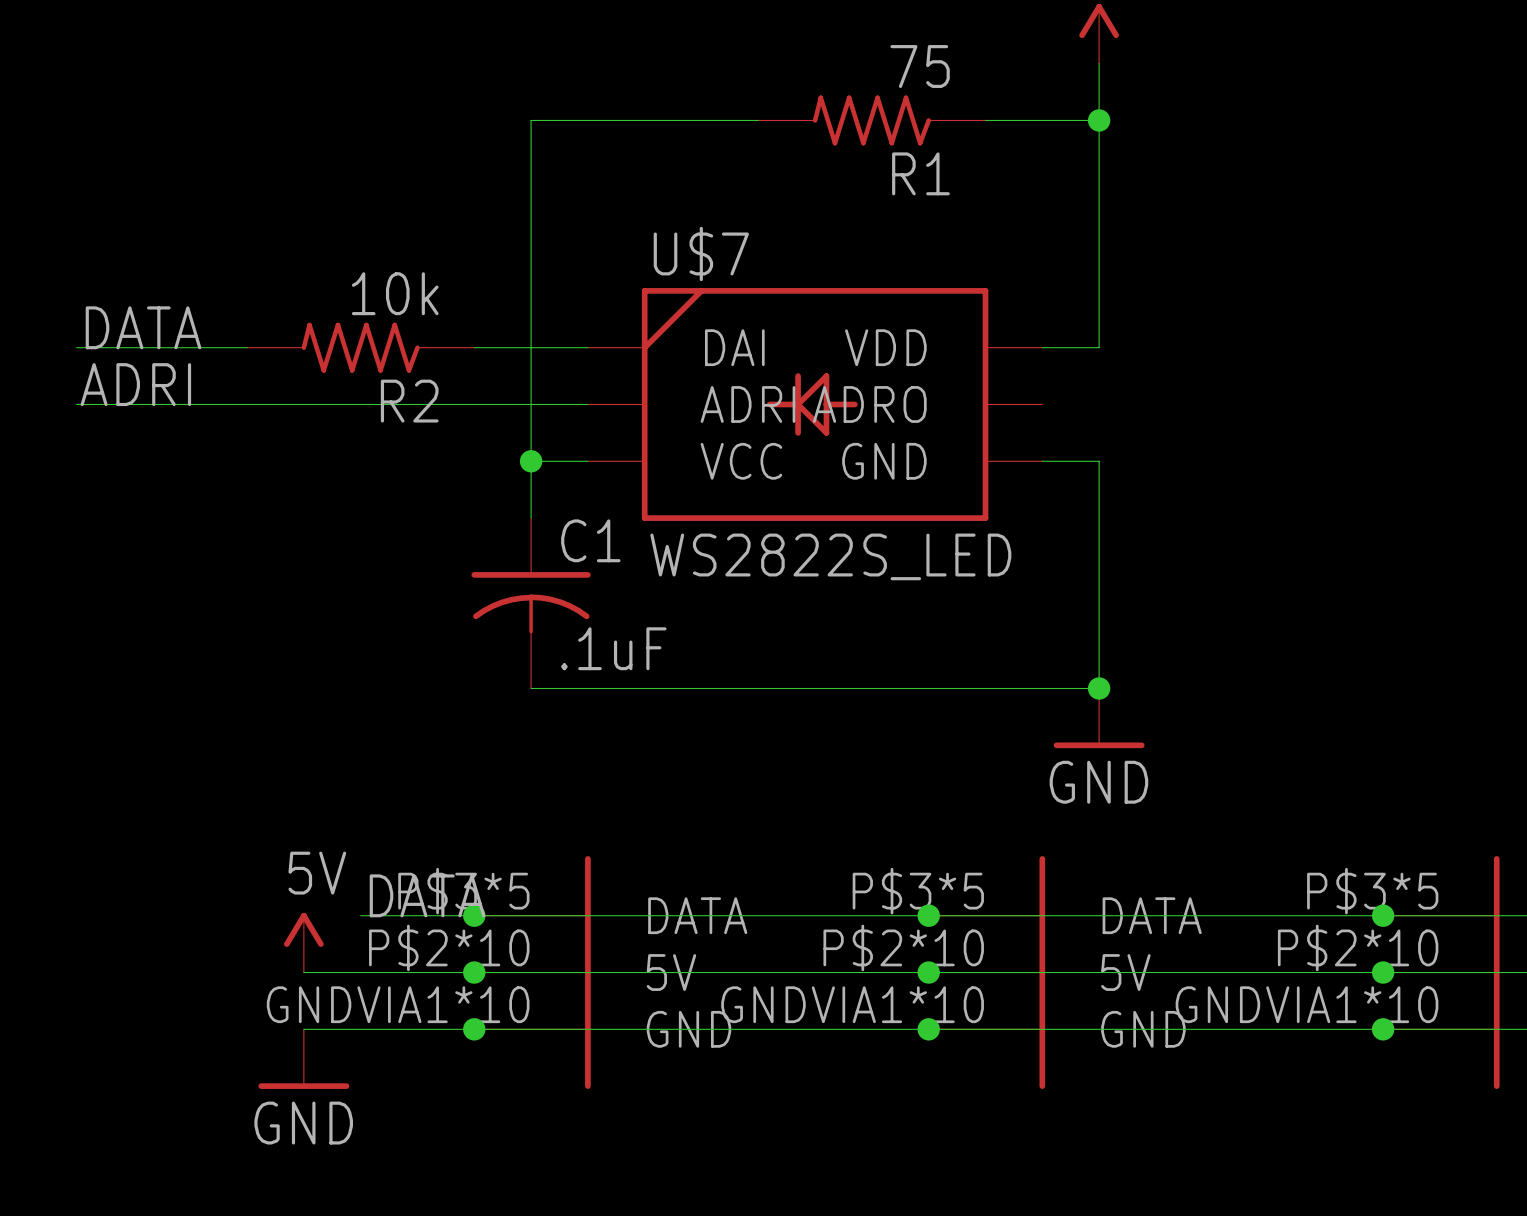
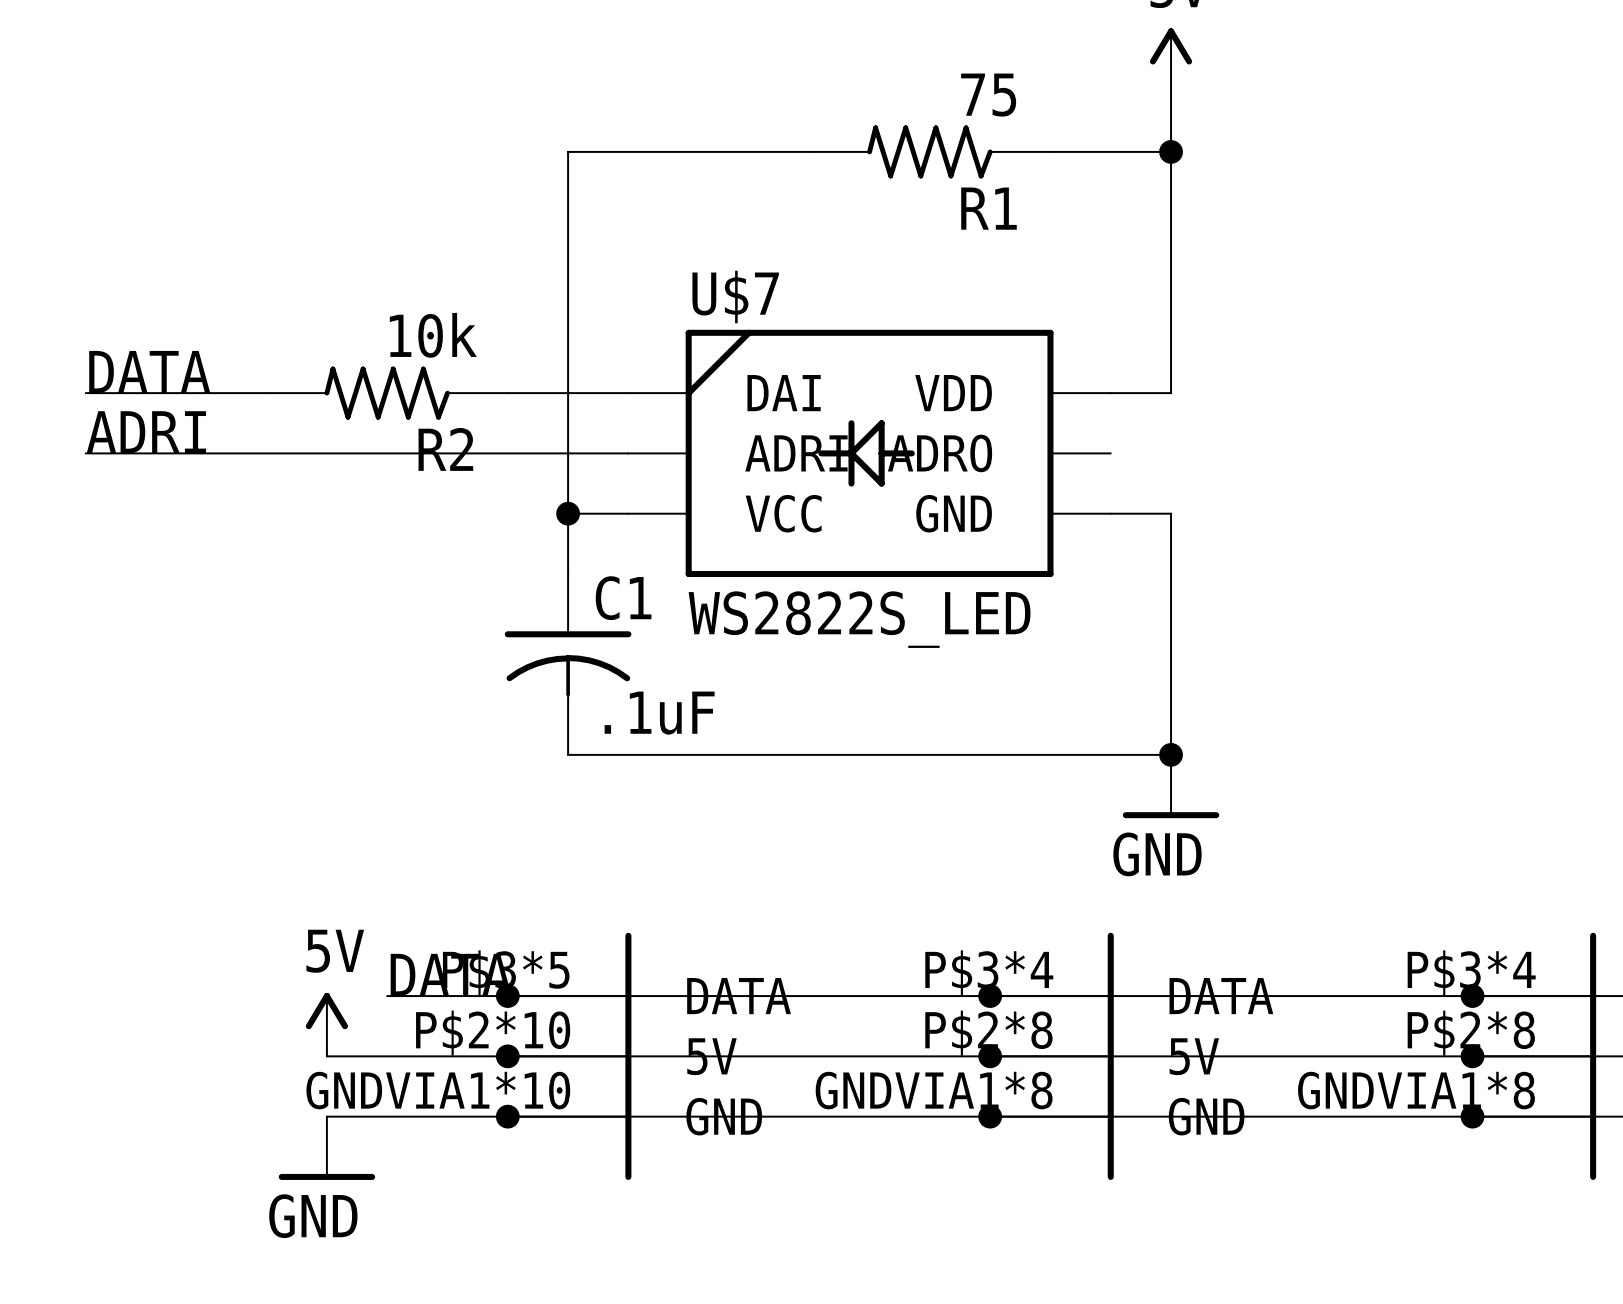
part pin number: P$3*5 (918, 891) -> P$3*4 (989, 972)
part pin number: P$3*5 (1372, 891) -> P$3*4 (1471, 972)
part pin number: P$2*10 (903, 947) -> P$2*8 (988, 1033)
part pin number: P$2*10 (1358, 947) -> P$2*8 (1471, 1033)
part pin number: GNDVIA1*10 (852, 1004) -> GNDVIA1*8 (934, 1090)
part pin number: GNDVIA1*10 (1307, 1004) -> GNDVIA1*8 (1416, 1090)

